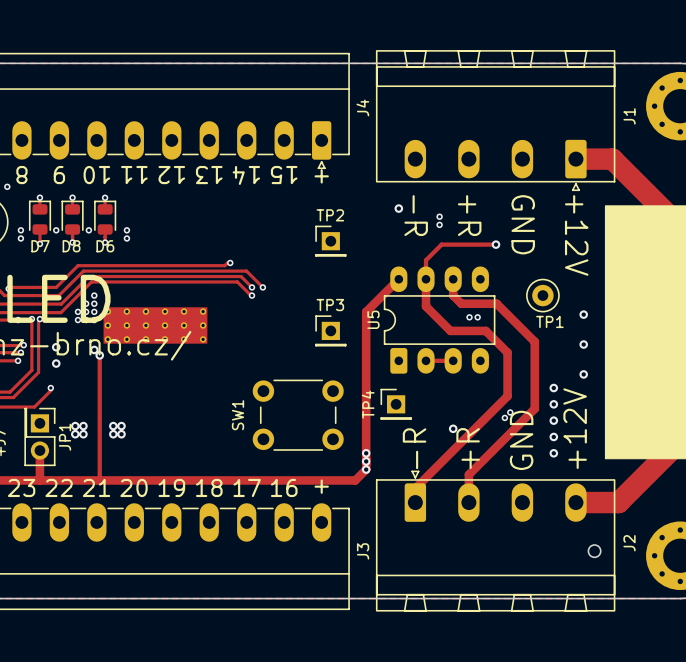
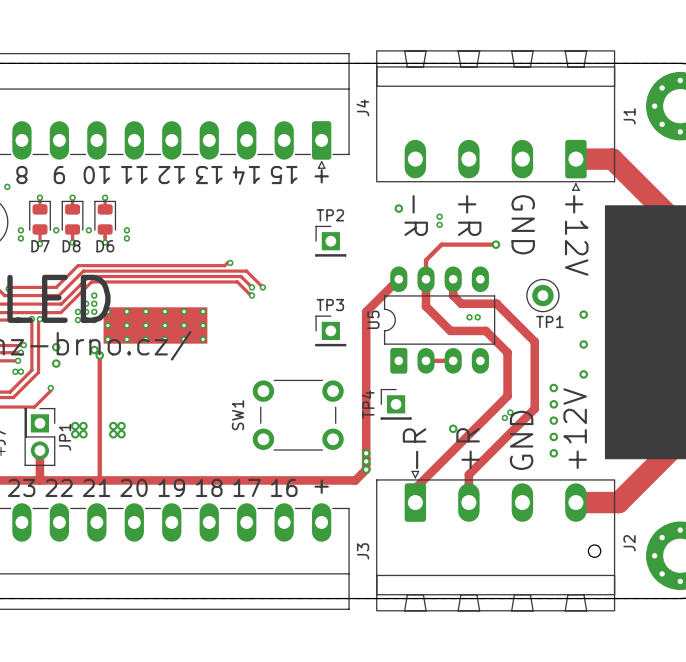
via: none -> (15, 371)
via: none -> (20, 371)

